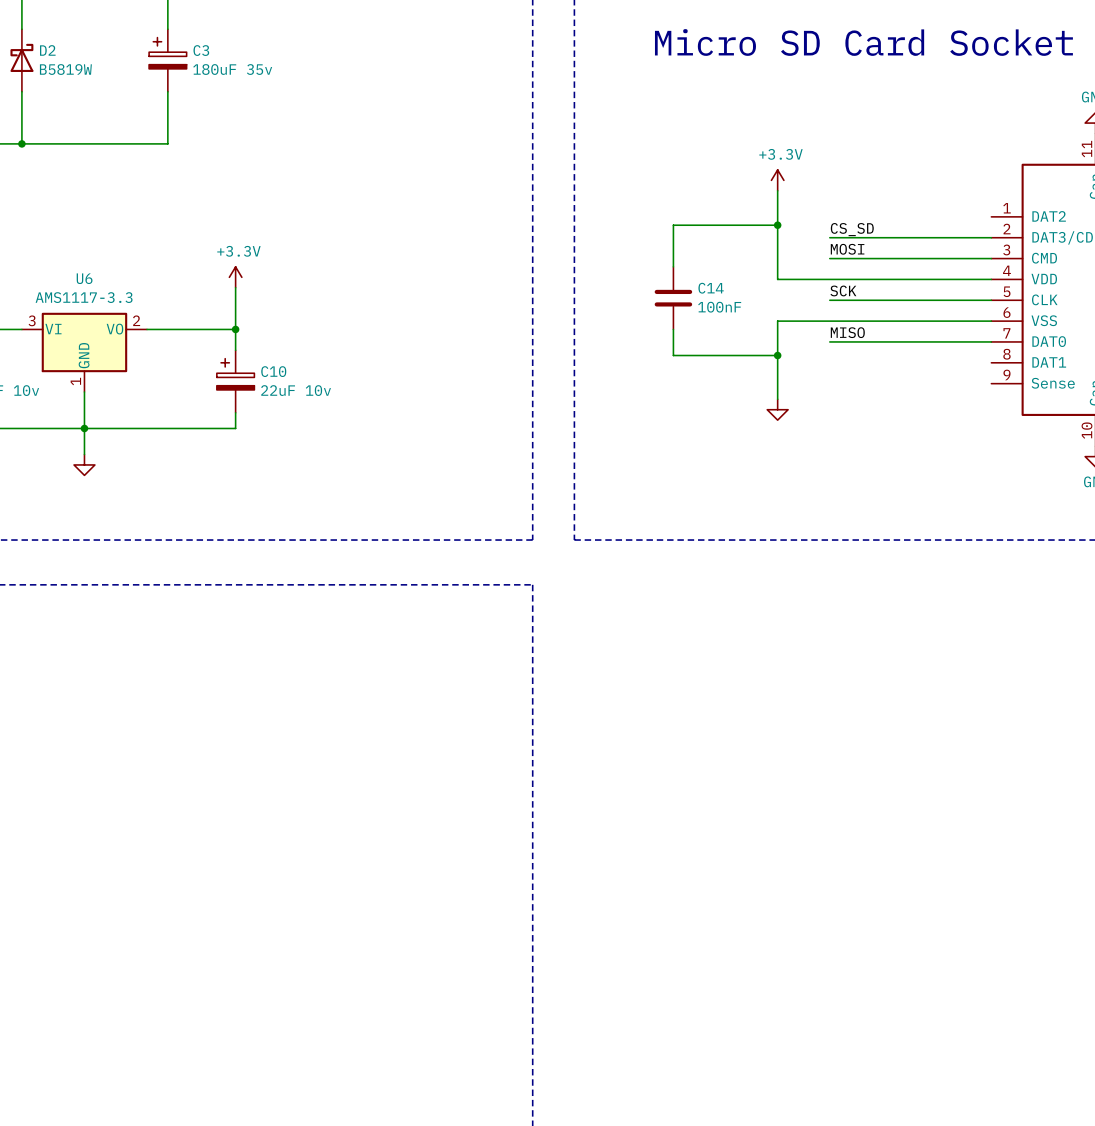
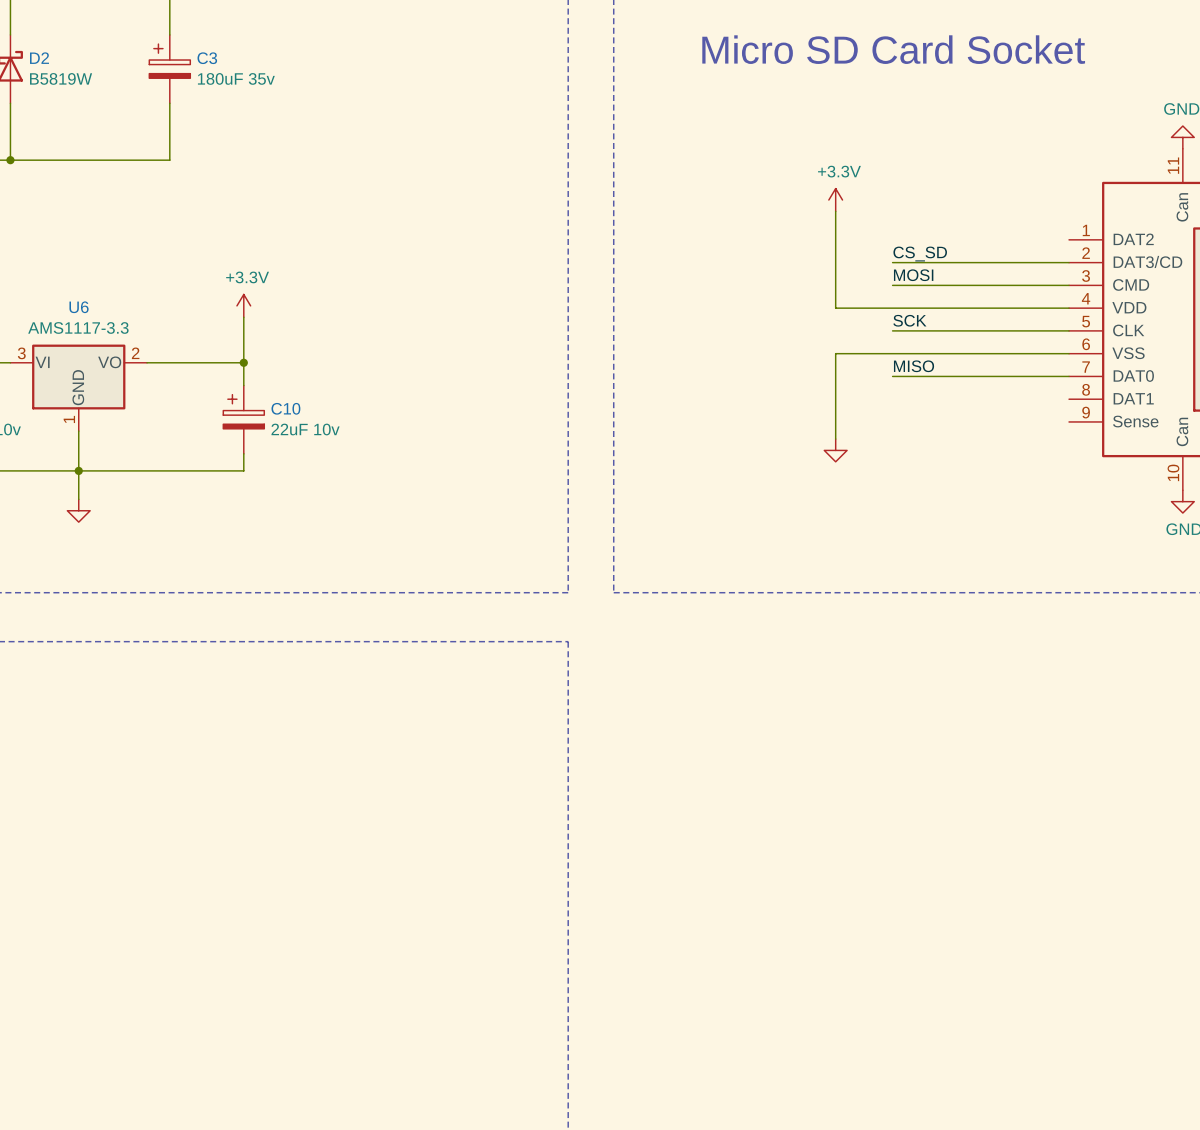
wire: (777, 225) (673, 225) (673, 266) -> none
junction: (777, 225) -> none
C14: 100nF (673, 298) -> none
wire: (673, 329) (673, 355) (777, 355) -> none
junction: (777, 355) -> none

